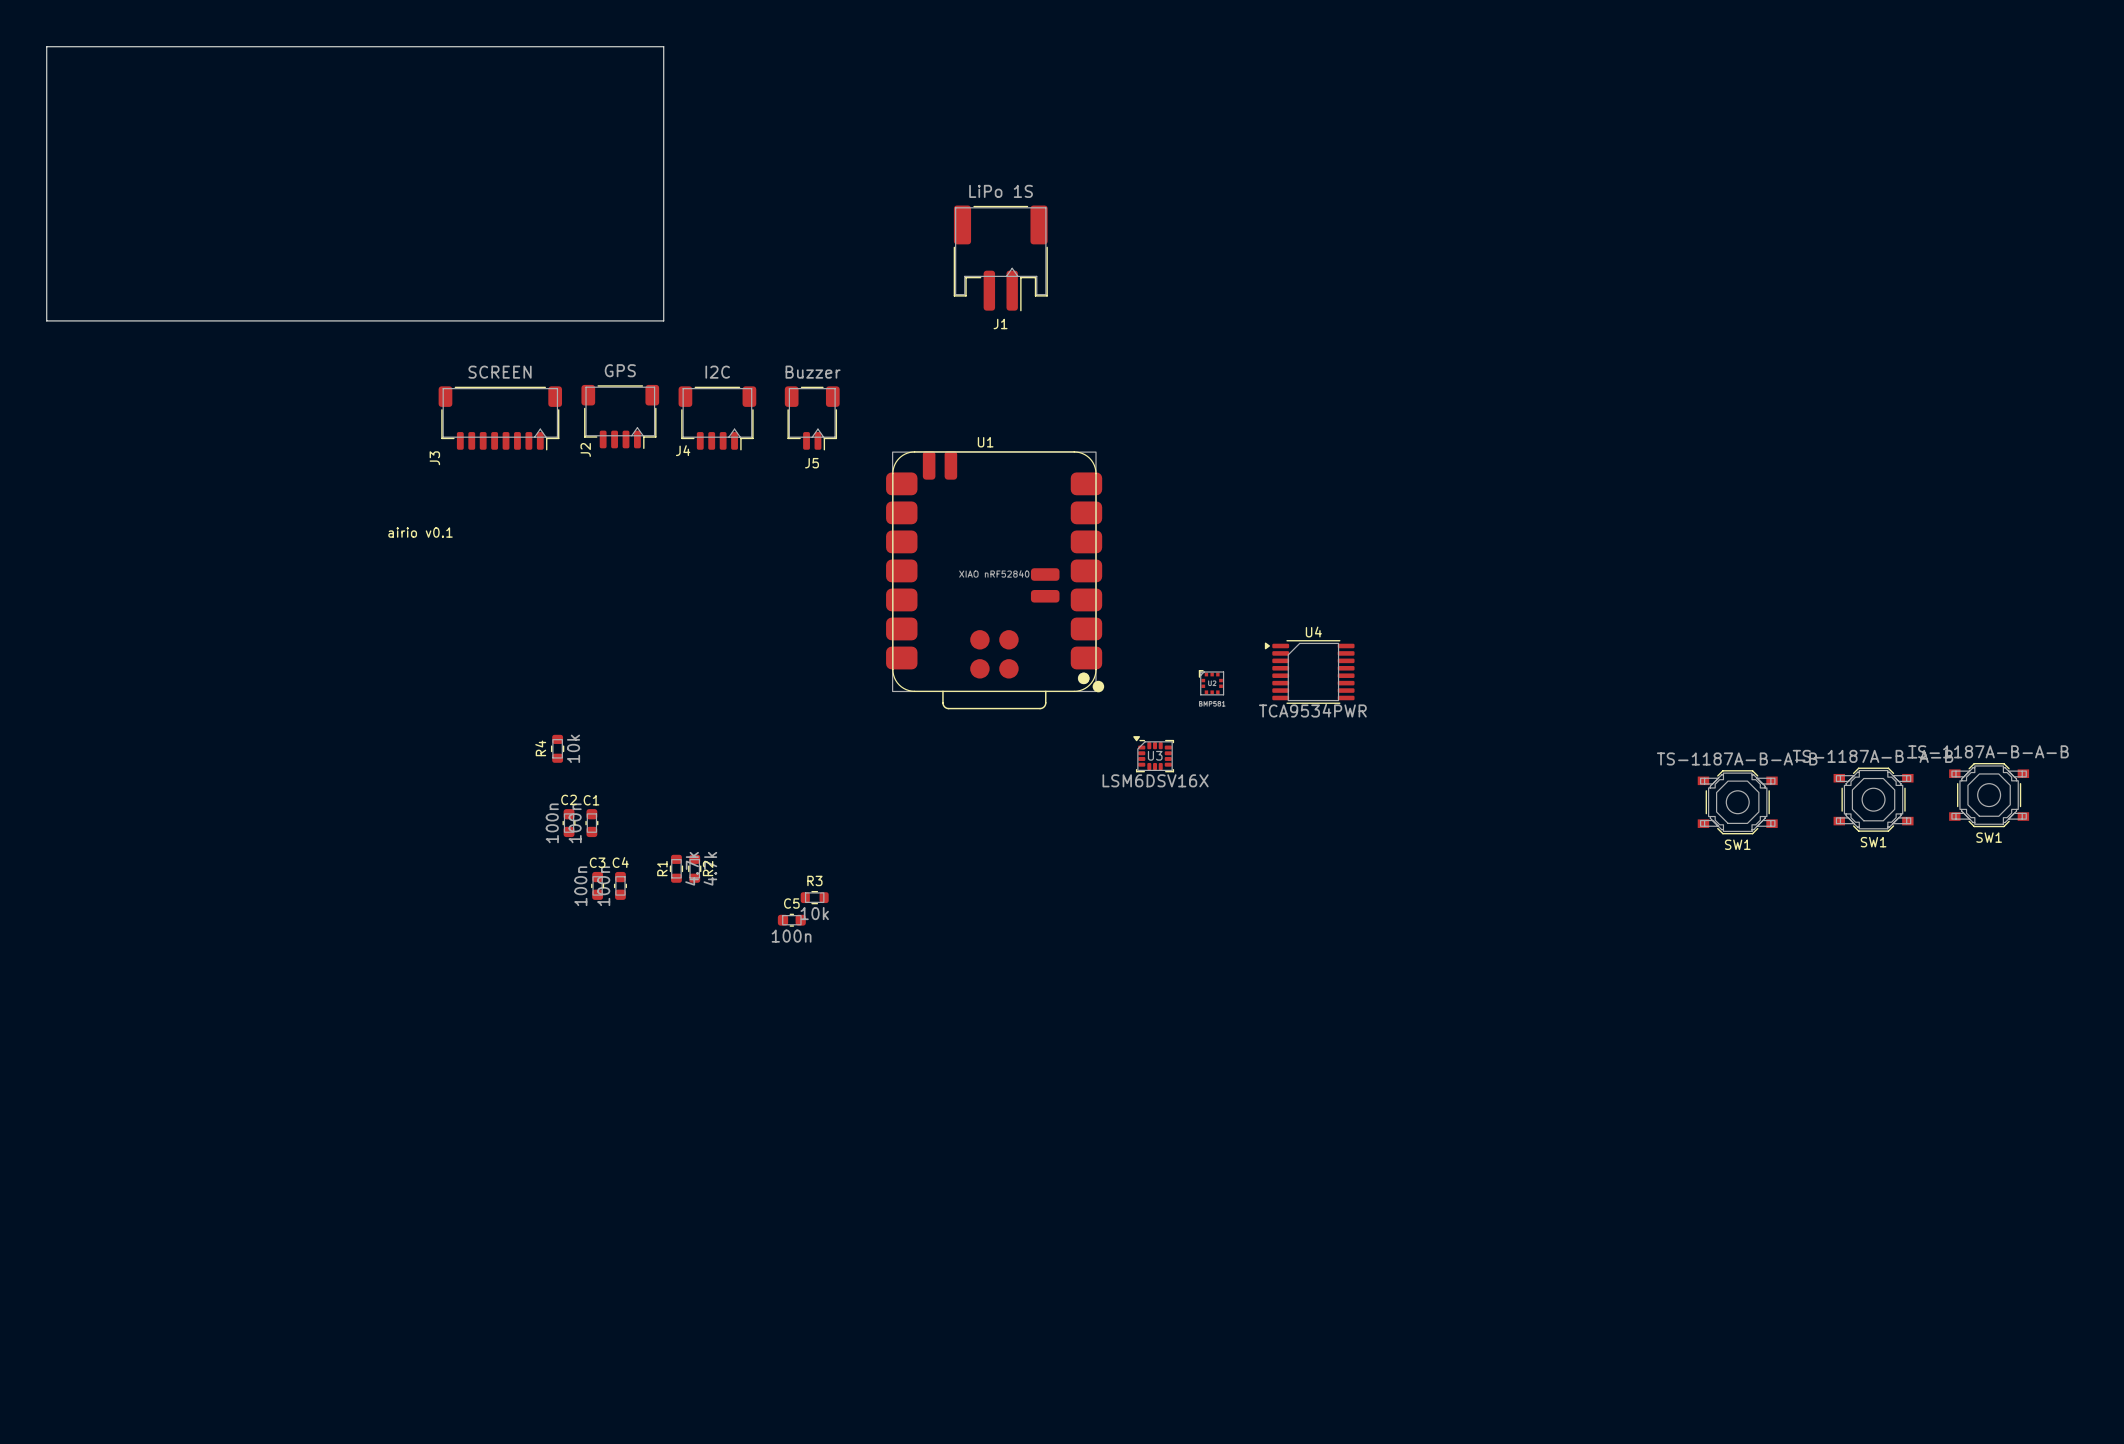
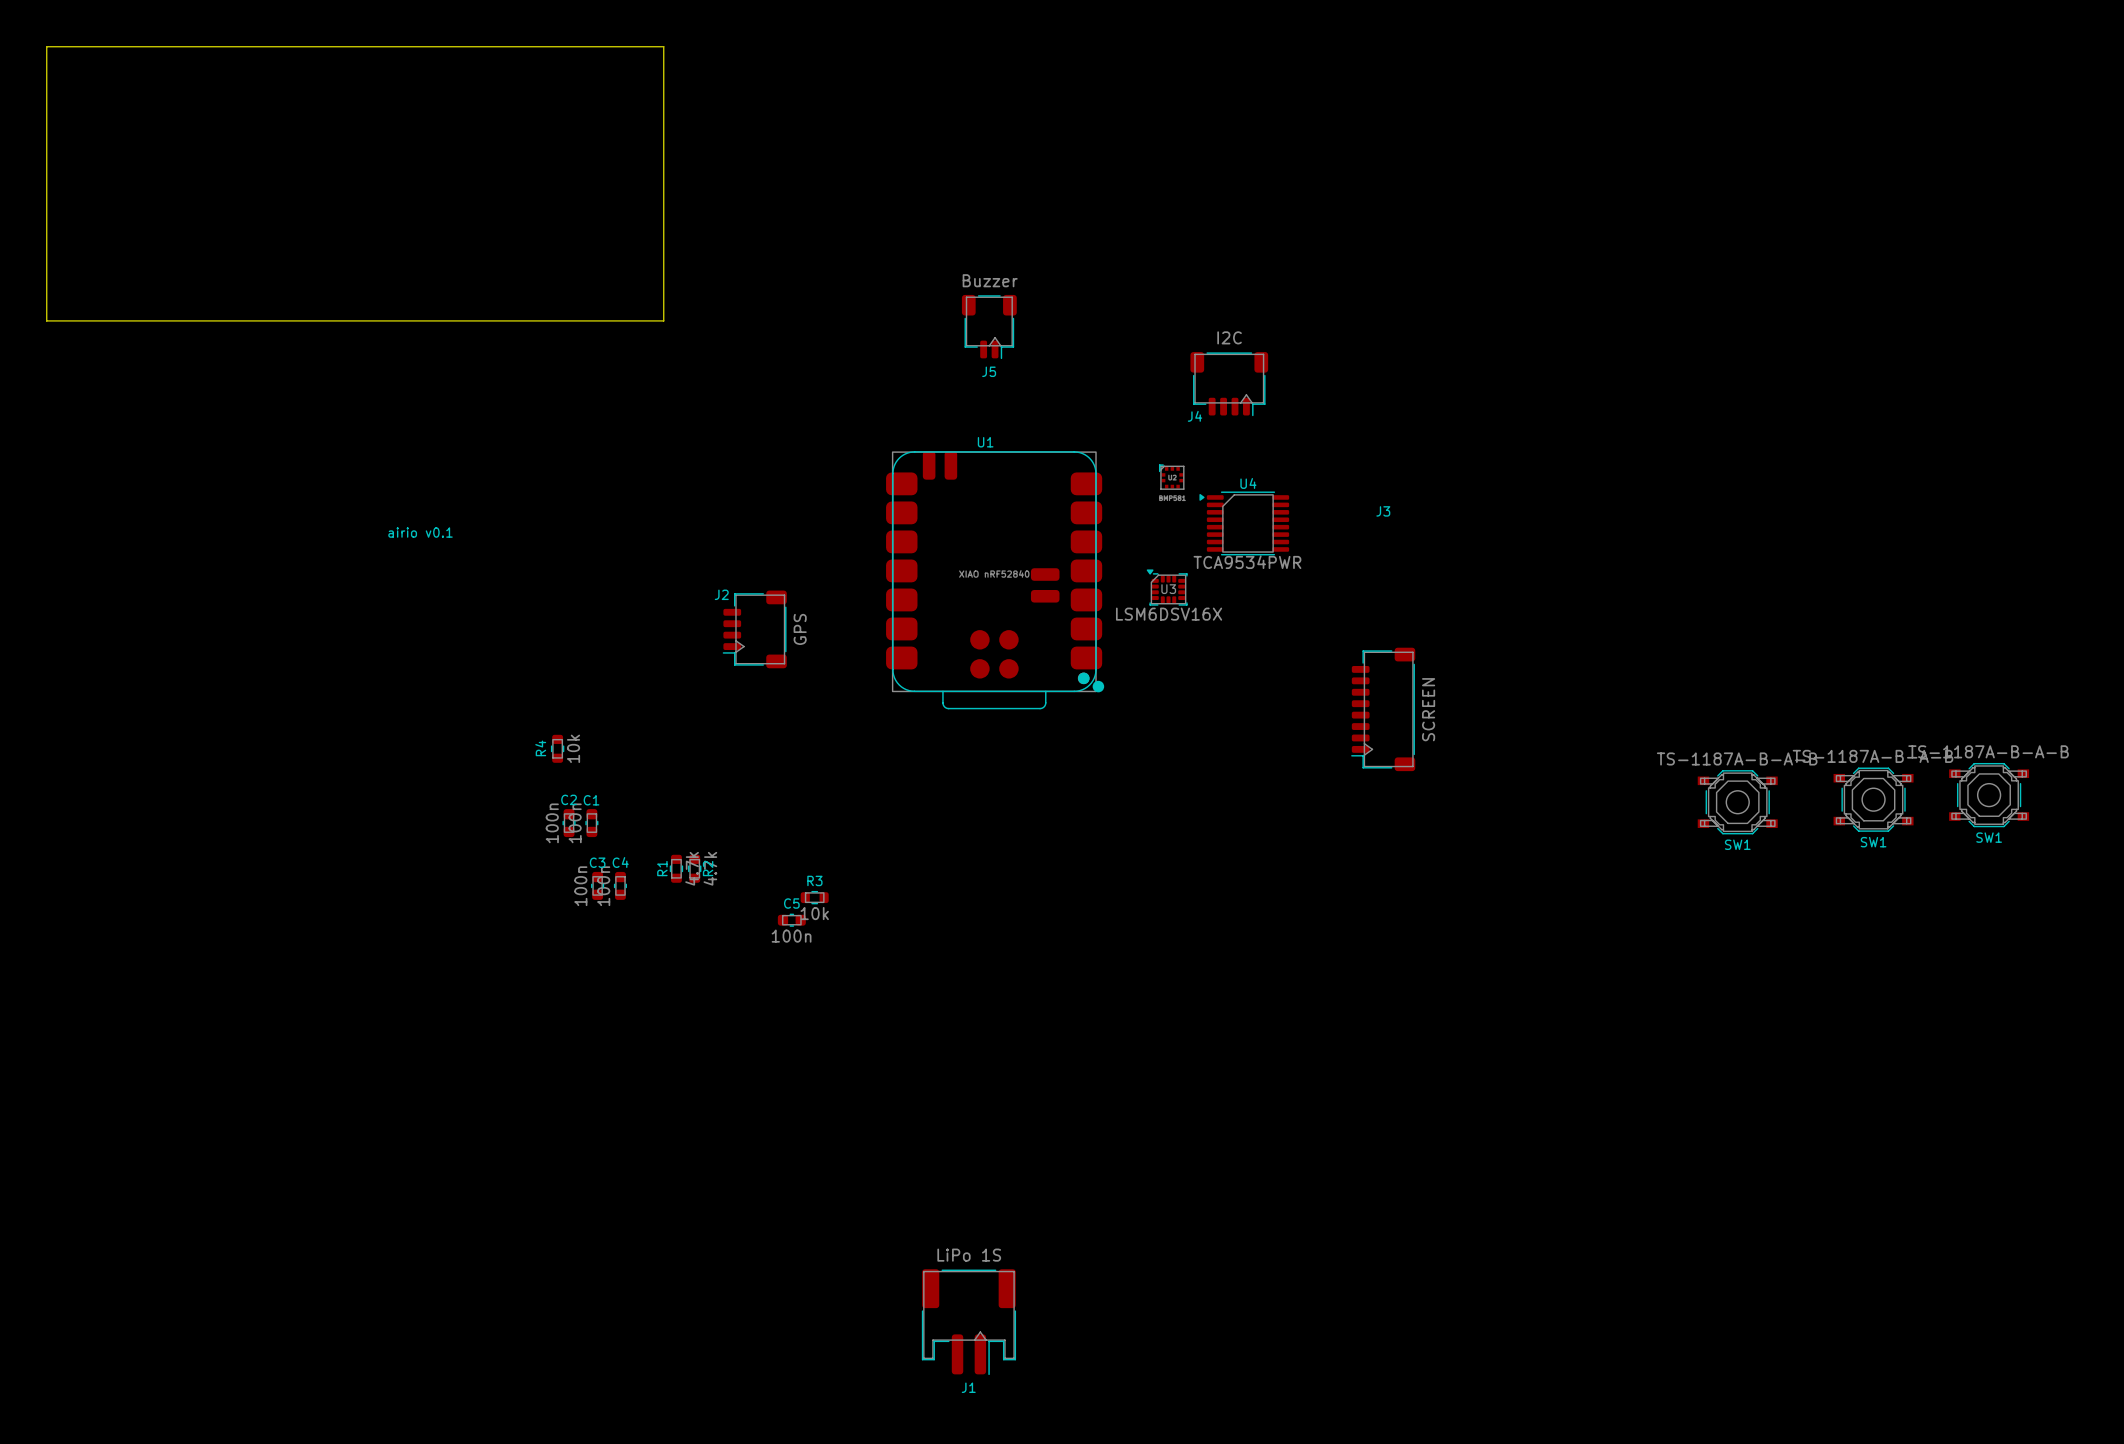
J1 position: (1000, 258) -> (968, 1322)
J2 rotation: 0° (620, 416) -> 90° clockwise (754, 629)
J2 position: (620, 416) -> (754, 629)
J3 rotation: 0° (500, 418) -> 90° clockwise (1383, 709)
J3 position: (500, 418) -> (1383, 709)
J4 position: (717, 418) -> (1229, 384)
J5 position: (812, 418) -> (989, 326)
J3 name position: J3 (434, 458) -> J3 (1383, 511)
U4 position: (1309, 671) -> (1244, 523)
part position: (1211, 682) -> (1171, 477)
U3 position: (1153, 754) -> (1167, 587)

